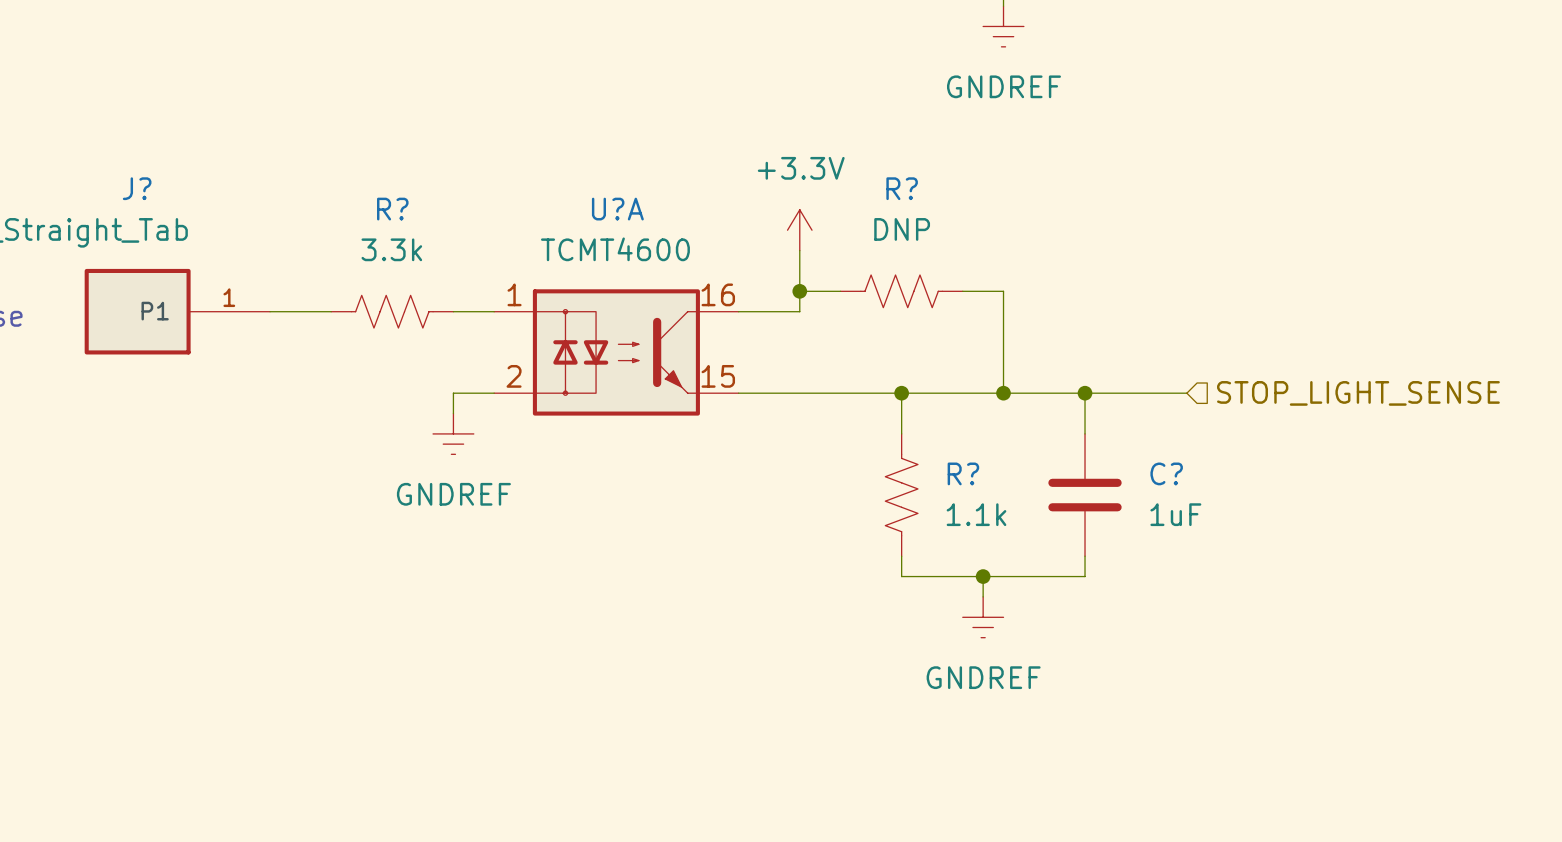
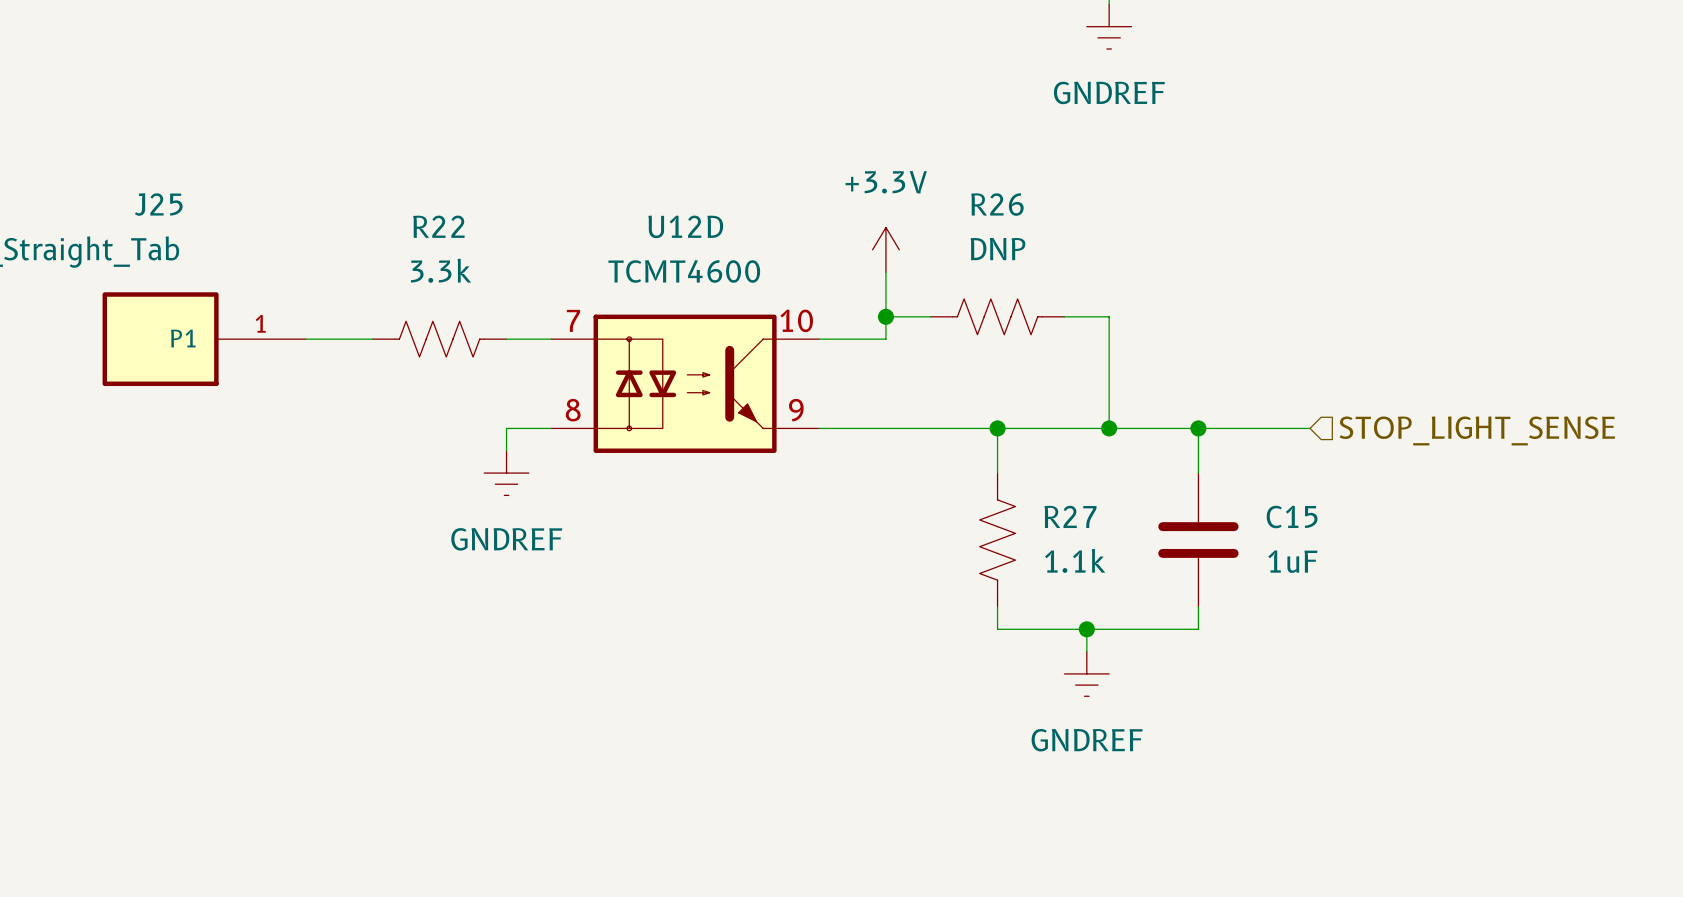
J? name: J? (137, 188) -> J25 (158, 204)
R? name: R? (902, 188) -> R26 (997, 204)
R? name: R? (392, 209) -> R22 (438, 226)
U?A name: U?A (617, 209) -> U12D (685, 226)
U?A pin number: 1 (514, 294) -> 7 (573, 320)
U?A pin number: 16 (718, 294) -> 10 (796, 320)
U?A pin number: 2 (514, 376) -> 8 (573, 410)
U?A pin number: 15 (718, 376) -> 9 (796, 410)
R? name: R? (963, 473) -> R27 (1070, 516)
C? name: C? (1166, 473) -> C15 (1292, 516)

